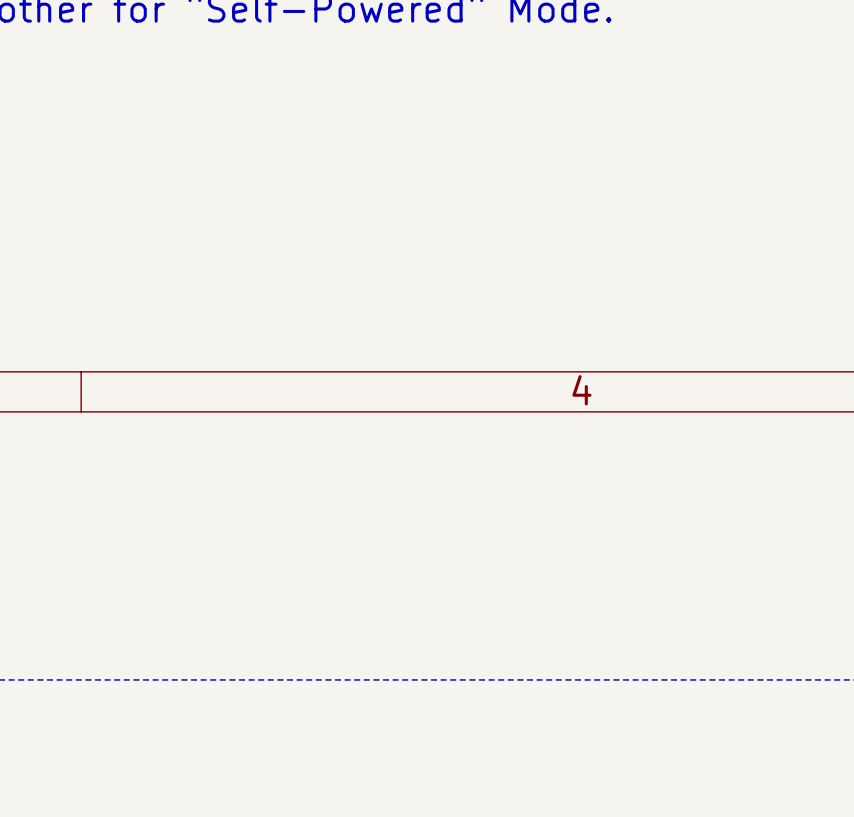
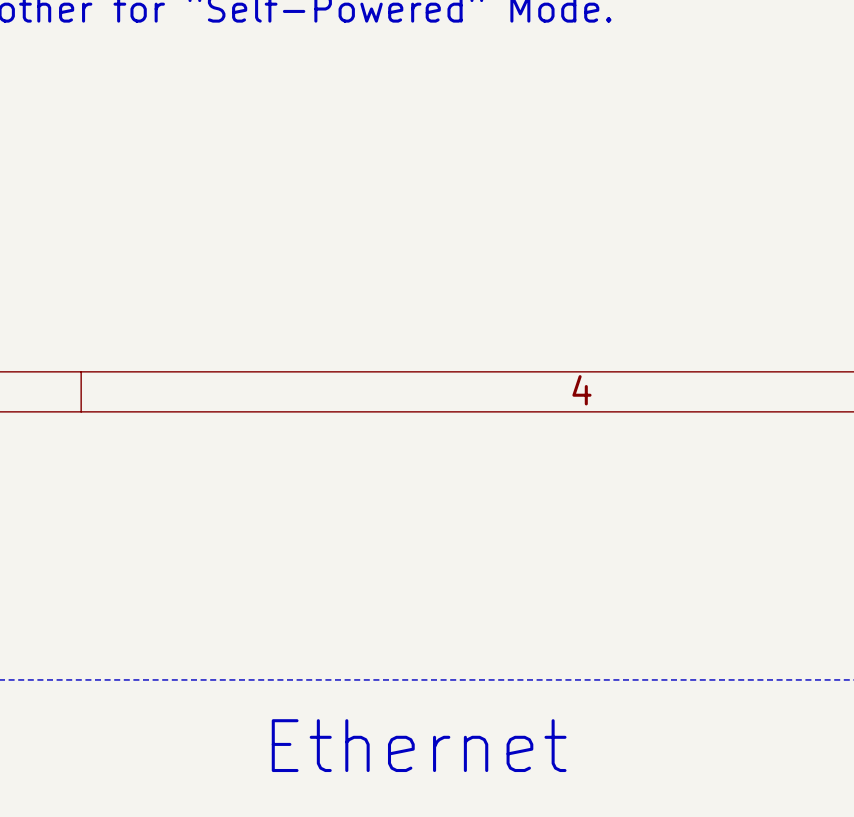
text: none -> Ethernet (419, 745)

